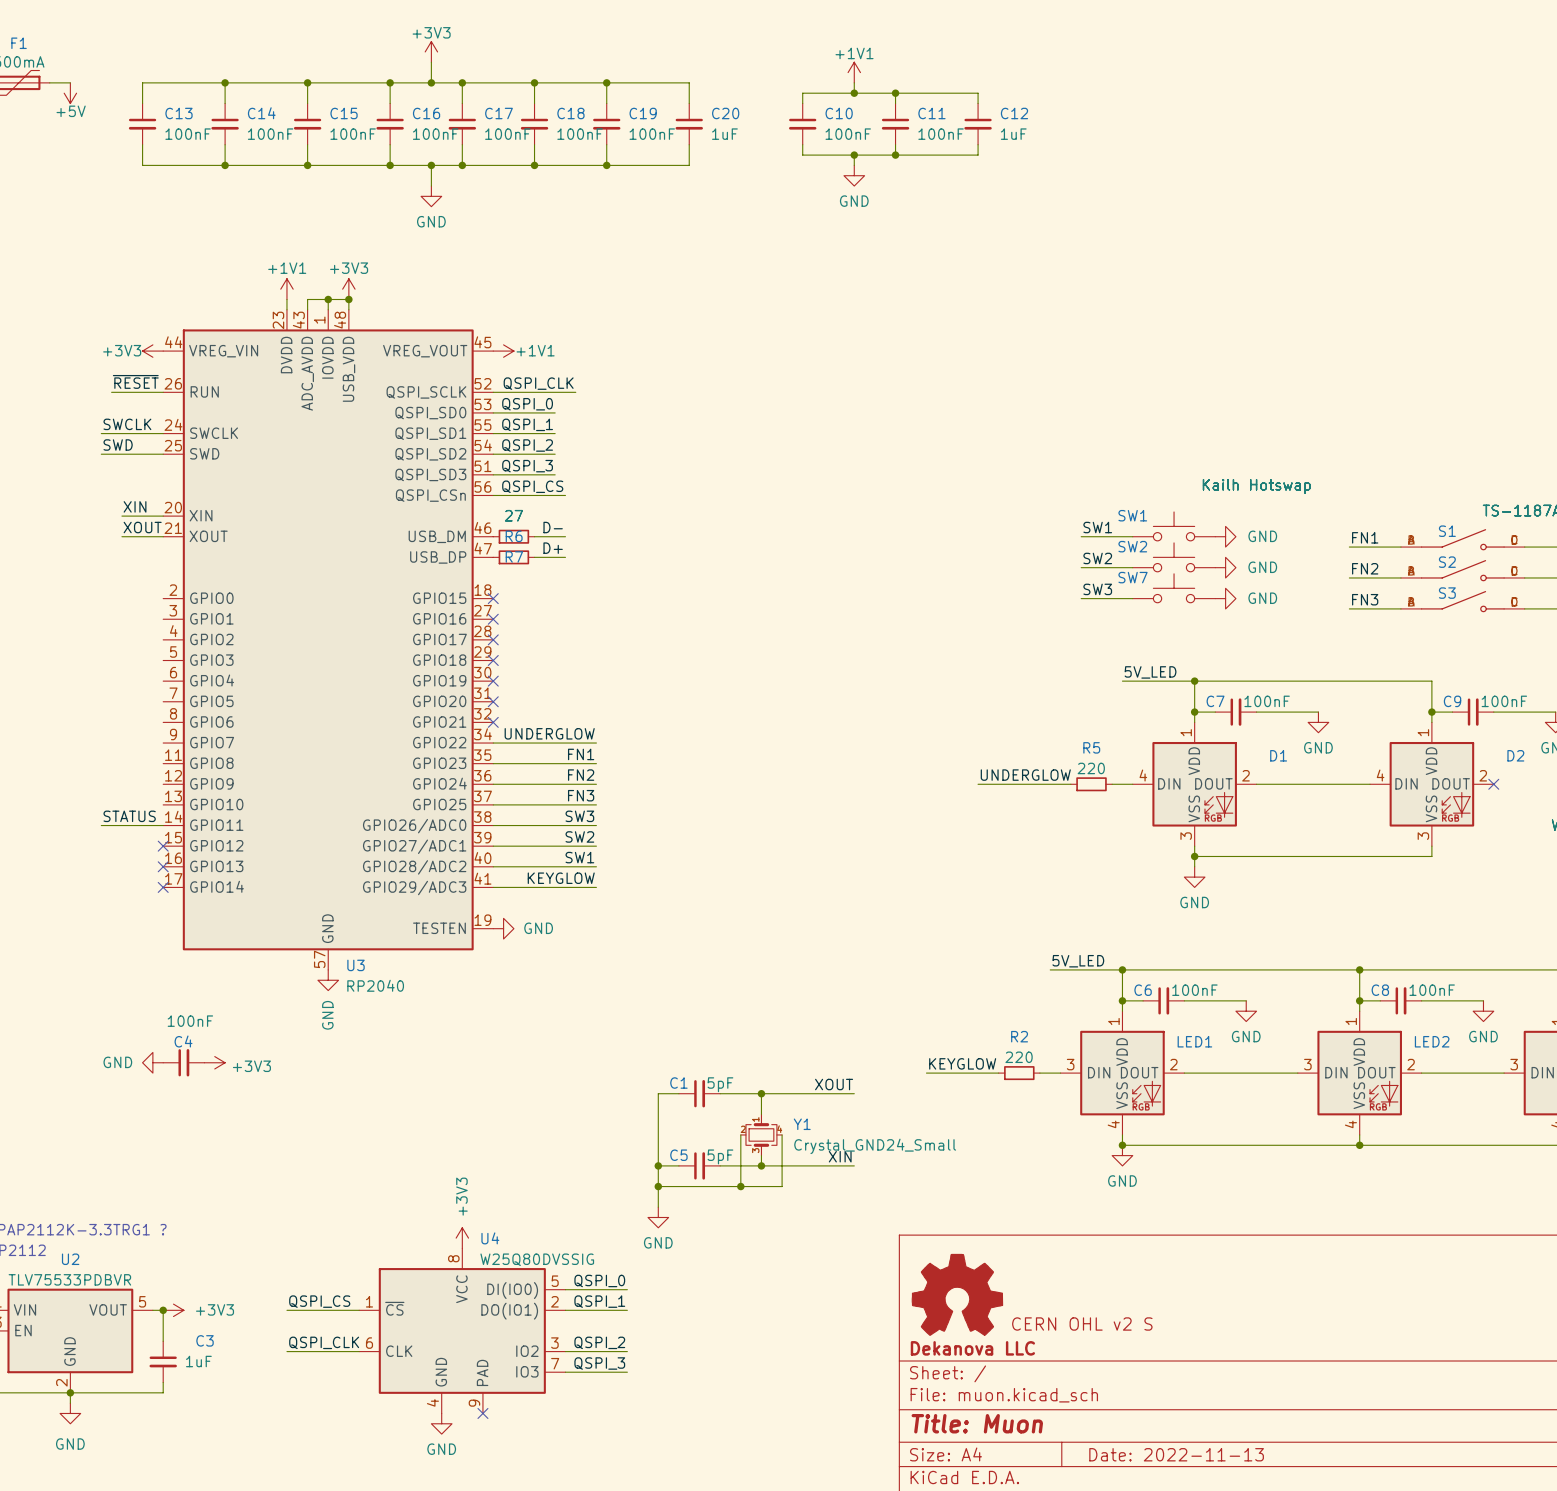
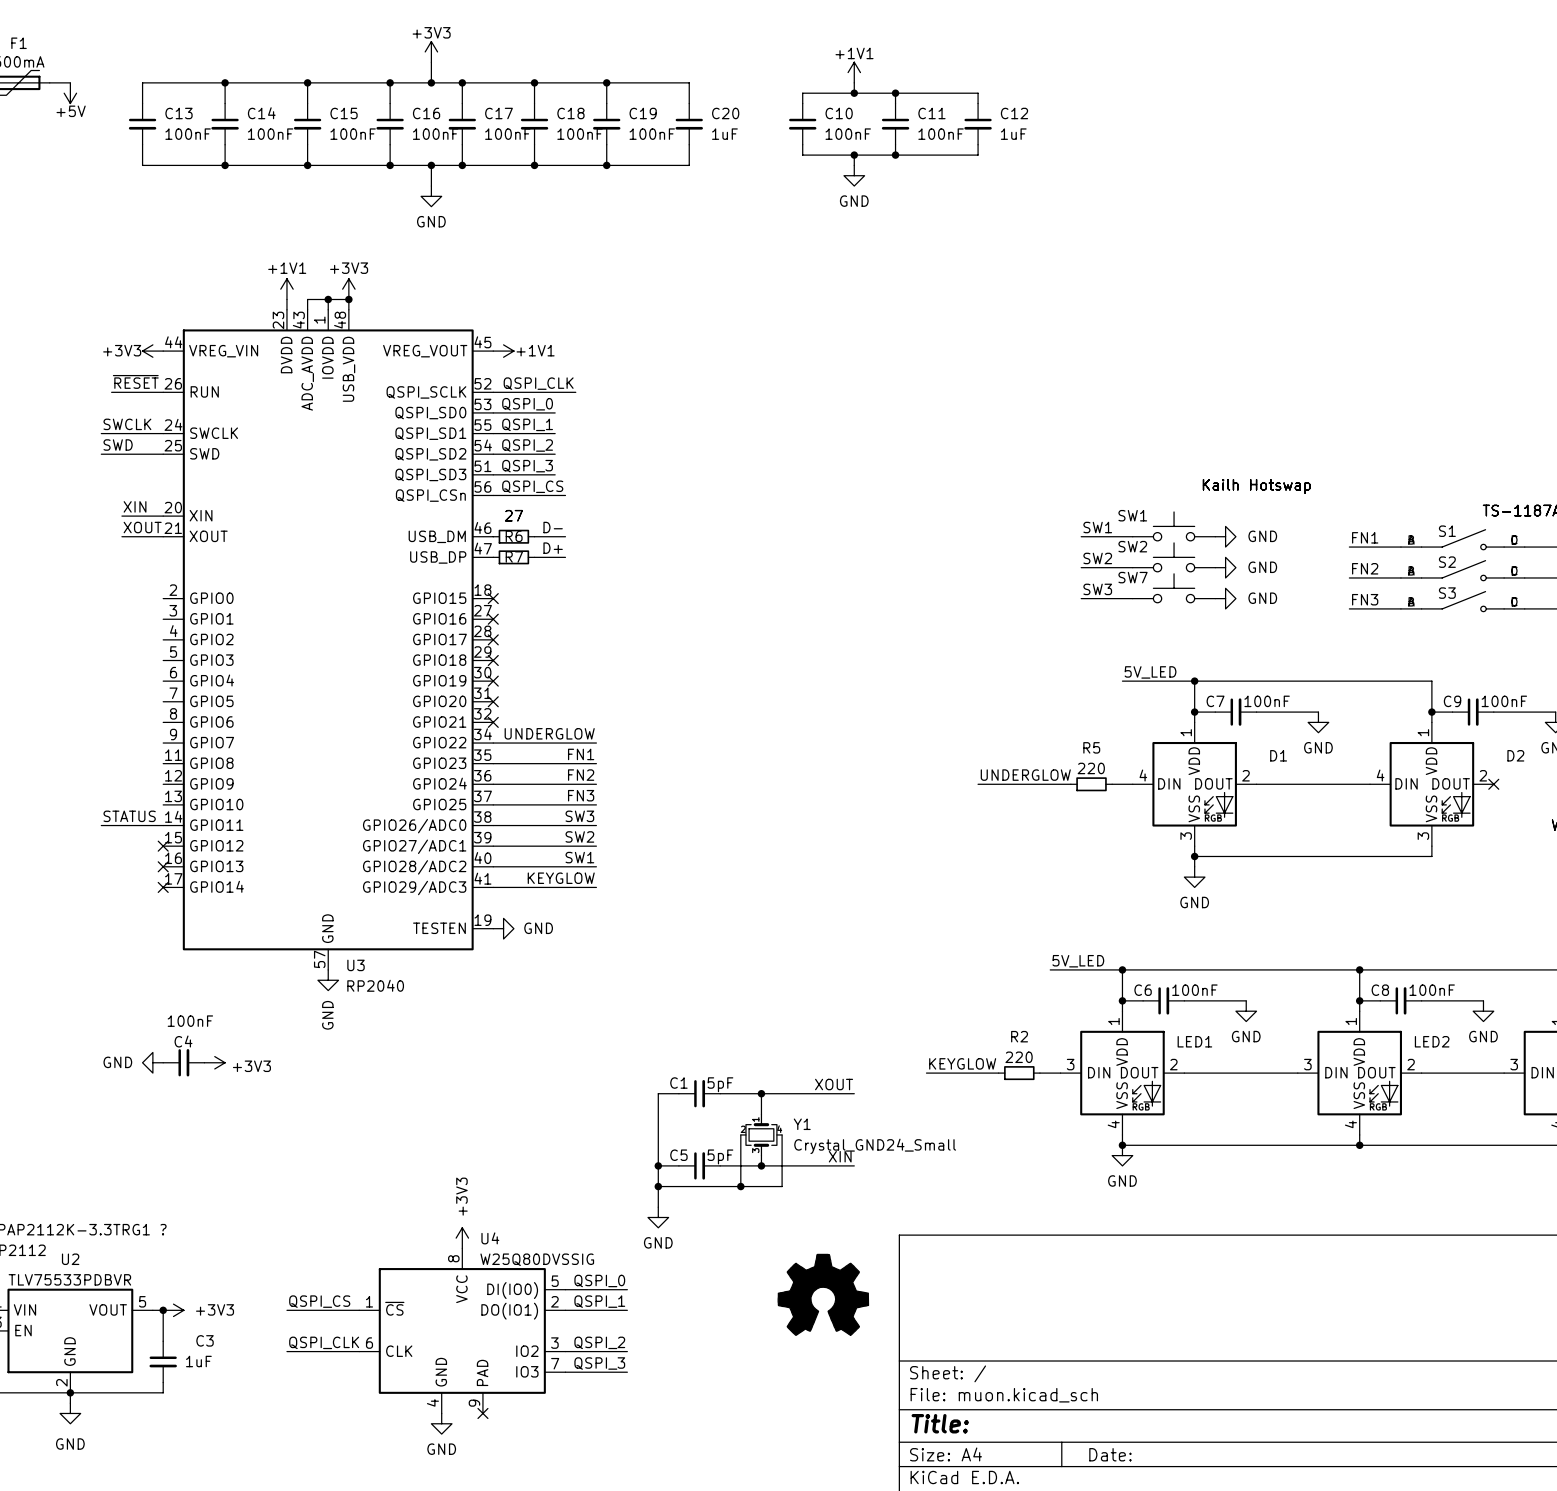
power symbol position: (957, 1294) -> (823, 1294)
title block: CERN OHL v2 S (1082, 1324) -> none
title block: Dekanova LLC (972, 1348) -> none
title block: Title: Muon (977, 1423) -> Title: (940, 1423)
title block: Date: 2022-11-13 (1176, 1454) -> Date: (1110, 1454)

